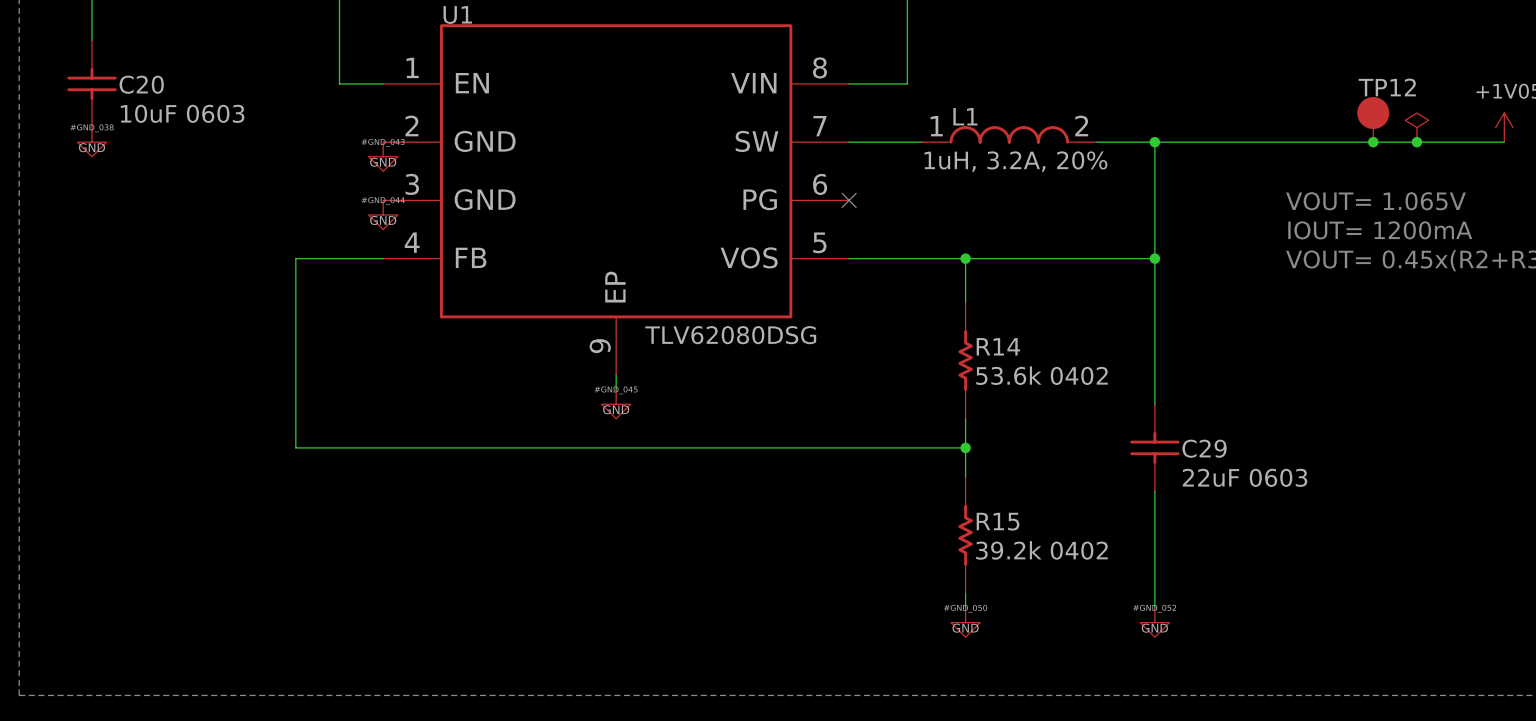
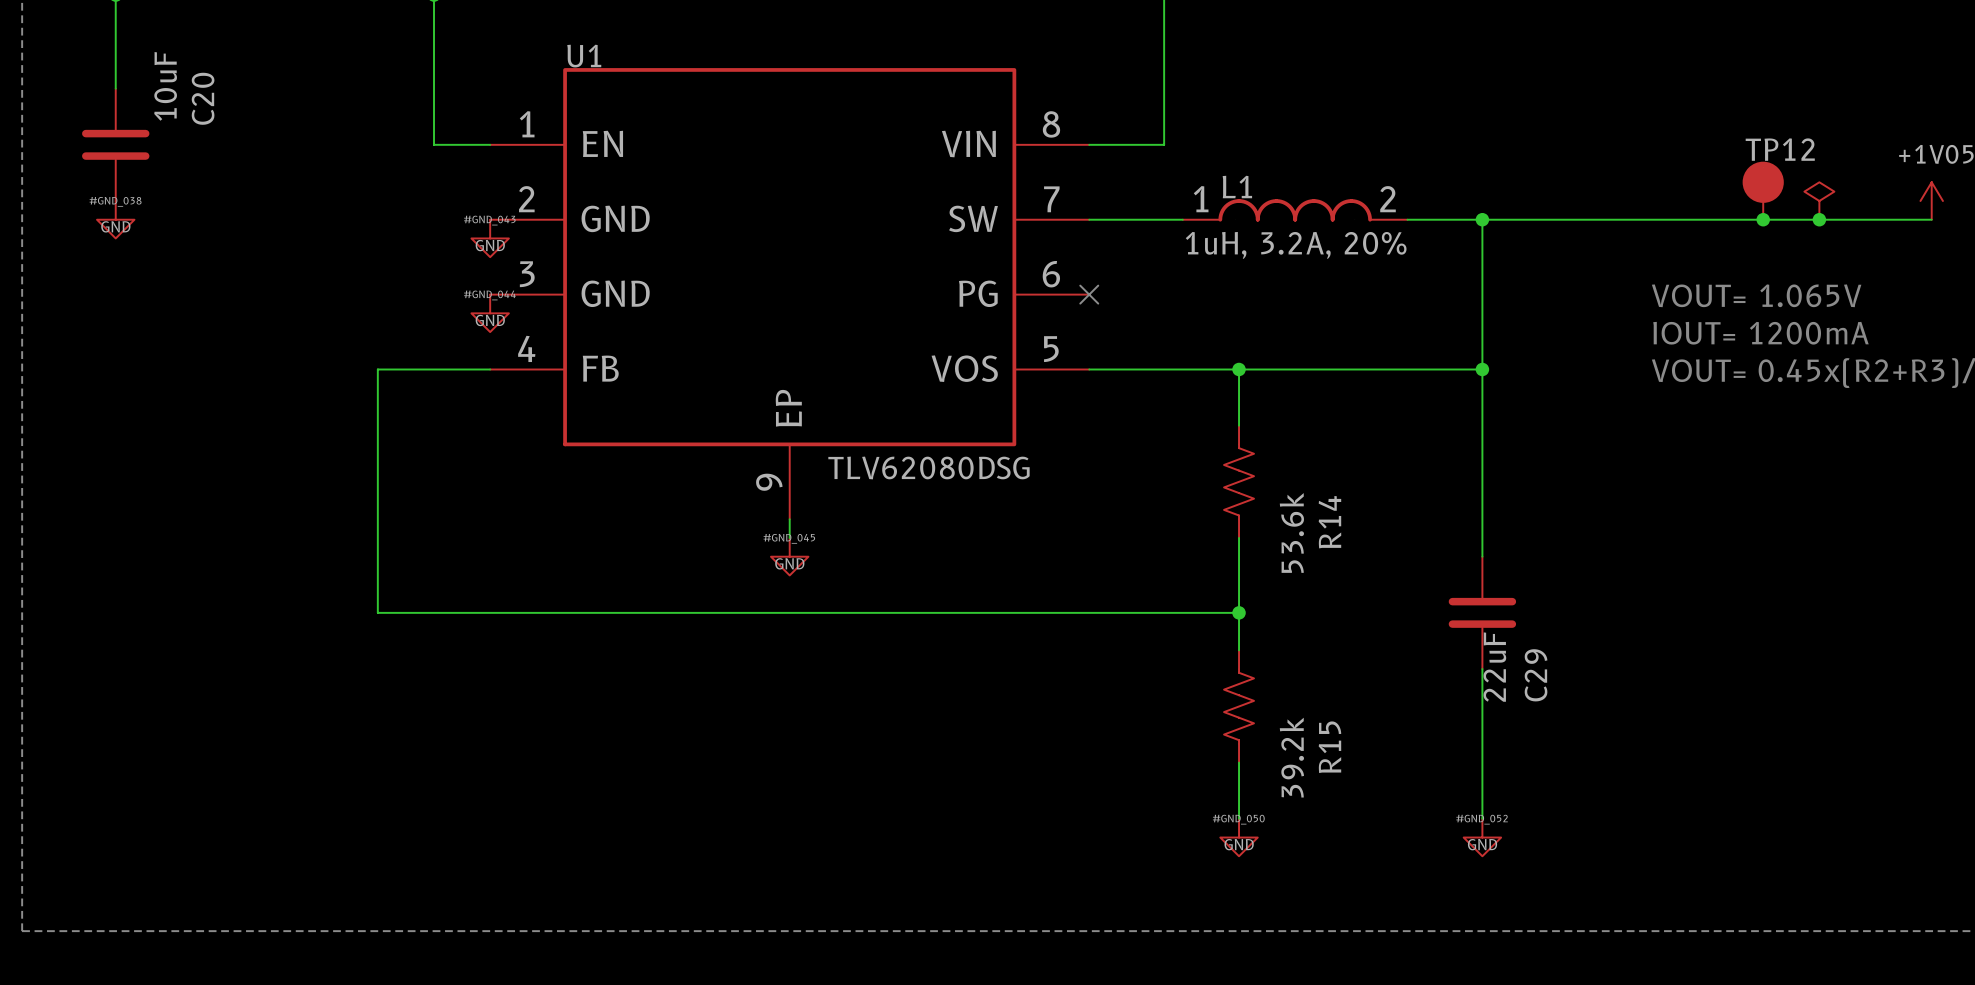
C20 symbol: [67, 40, 117, 128] -> [82, 88, 150, 202]
C20 name position: C20 (141, 84) -> C20 (203, 98)
C20 value: 10uF 0603 (182, 113) -> 10uF (165, 86)
R14 symbol: [958, 302, 973, 419] -> [1224, 425, 1255, 538]
R14 name position: R14 (998, 346) -> R14 (1329, 522)
R14 value: 53.6k 0402 (1041, 375) -> 53.6k (1291, 532)
C29 symbol: [1130, 404, 1180, 492] -> [1448, 556, 1517, 670]
C29 name position: C29 (1204, 448) -> C29 (1536, 675)
R15 symbol: [958, 477, 973, 594] -> [1224, 650, 1255, 763]
C29 value: 22uF 0603 (1245, 477) -> 22uF (1494, 667)
R15 name position: R15 (998, 521) -> R15 (1329, 747)
R15 value: 39.2k 0402 (1041, 550) -> 39.2k (1291, 757)

